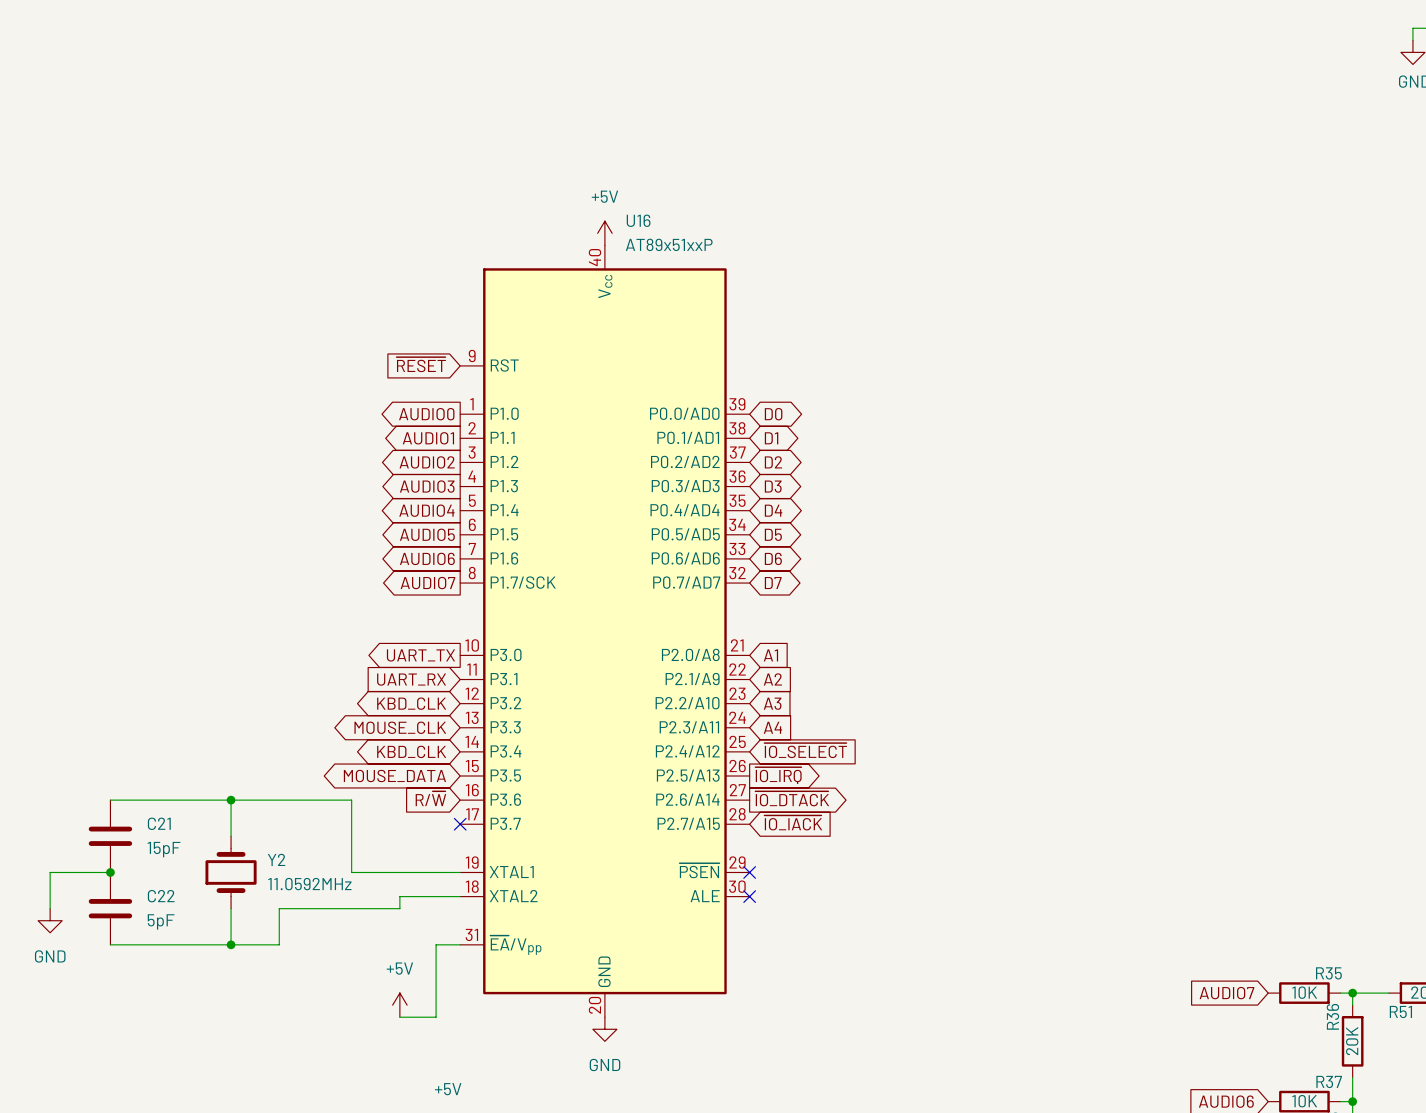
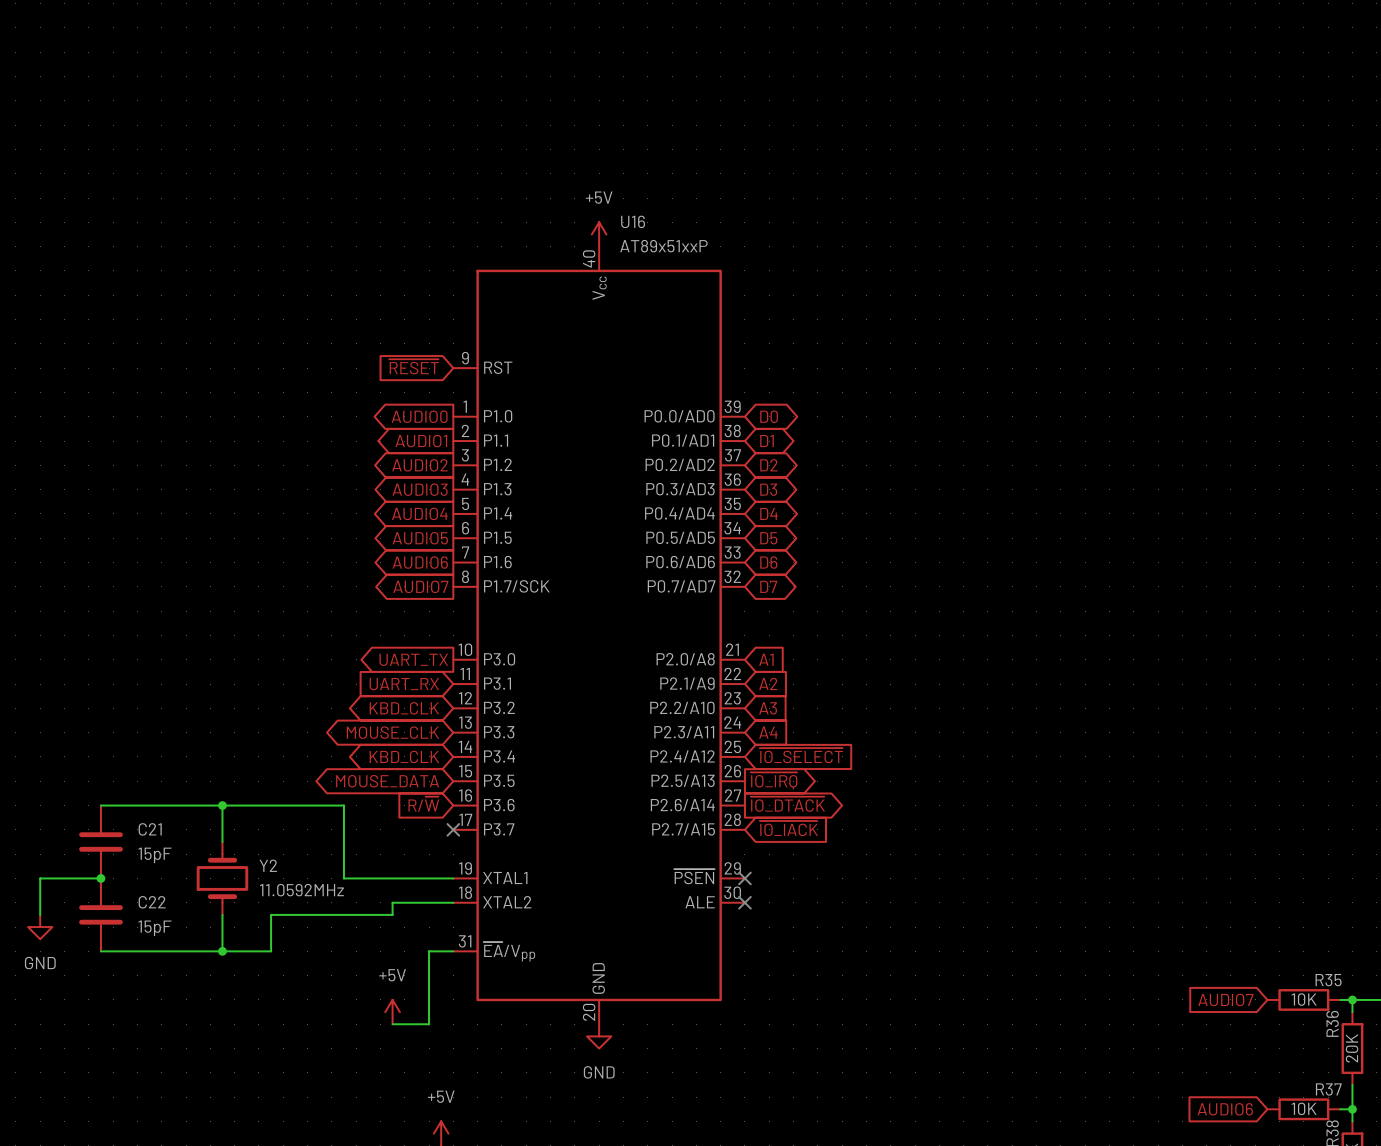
C22 value: 5pF (161, 921) -> 15pF (154, 928)

